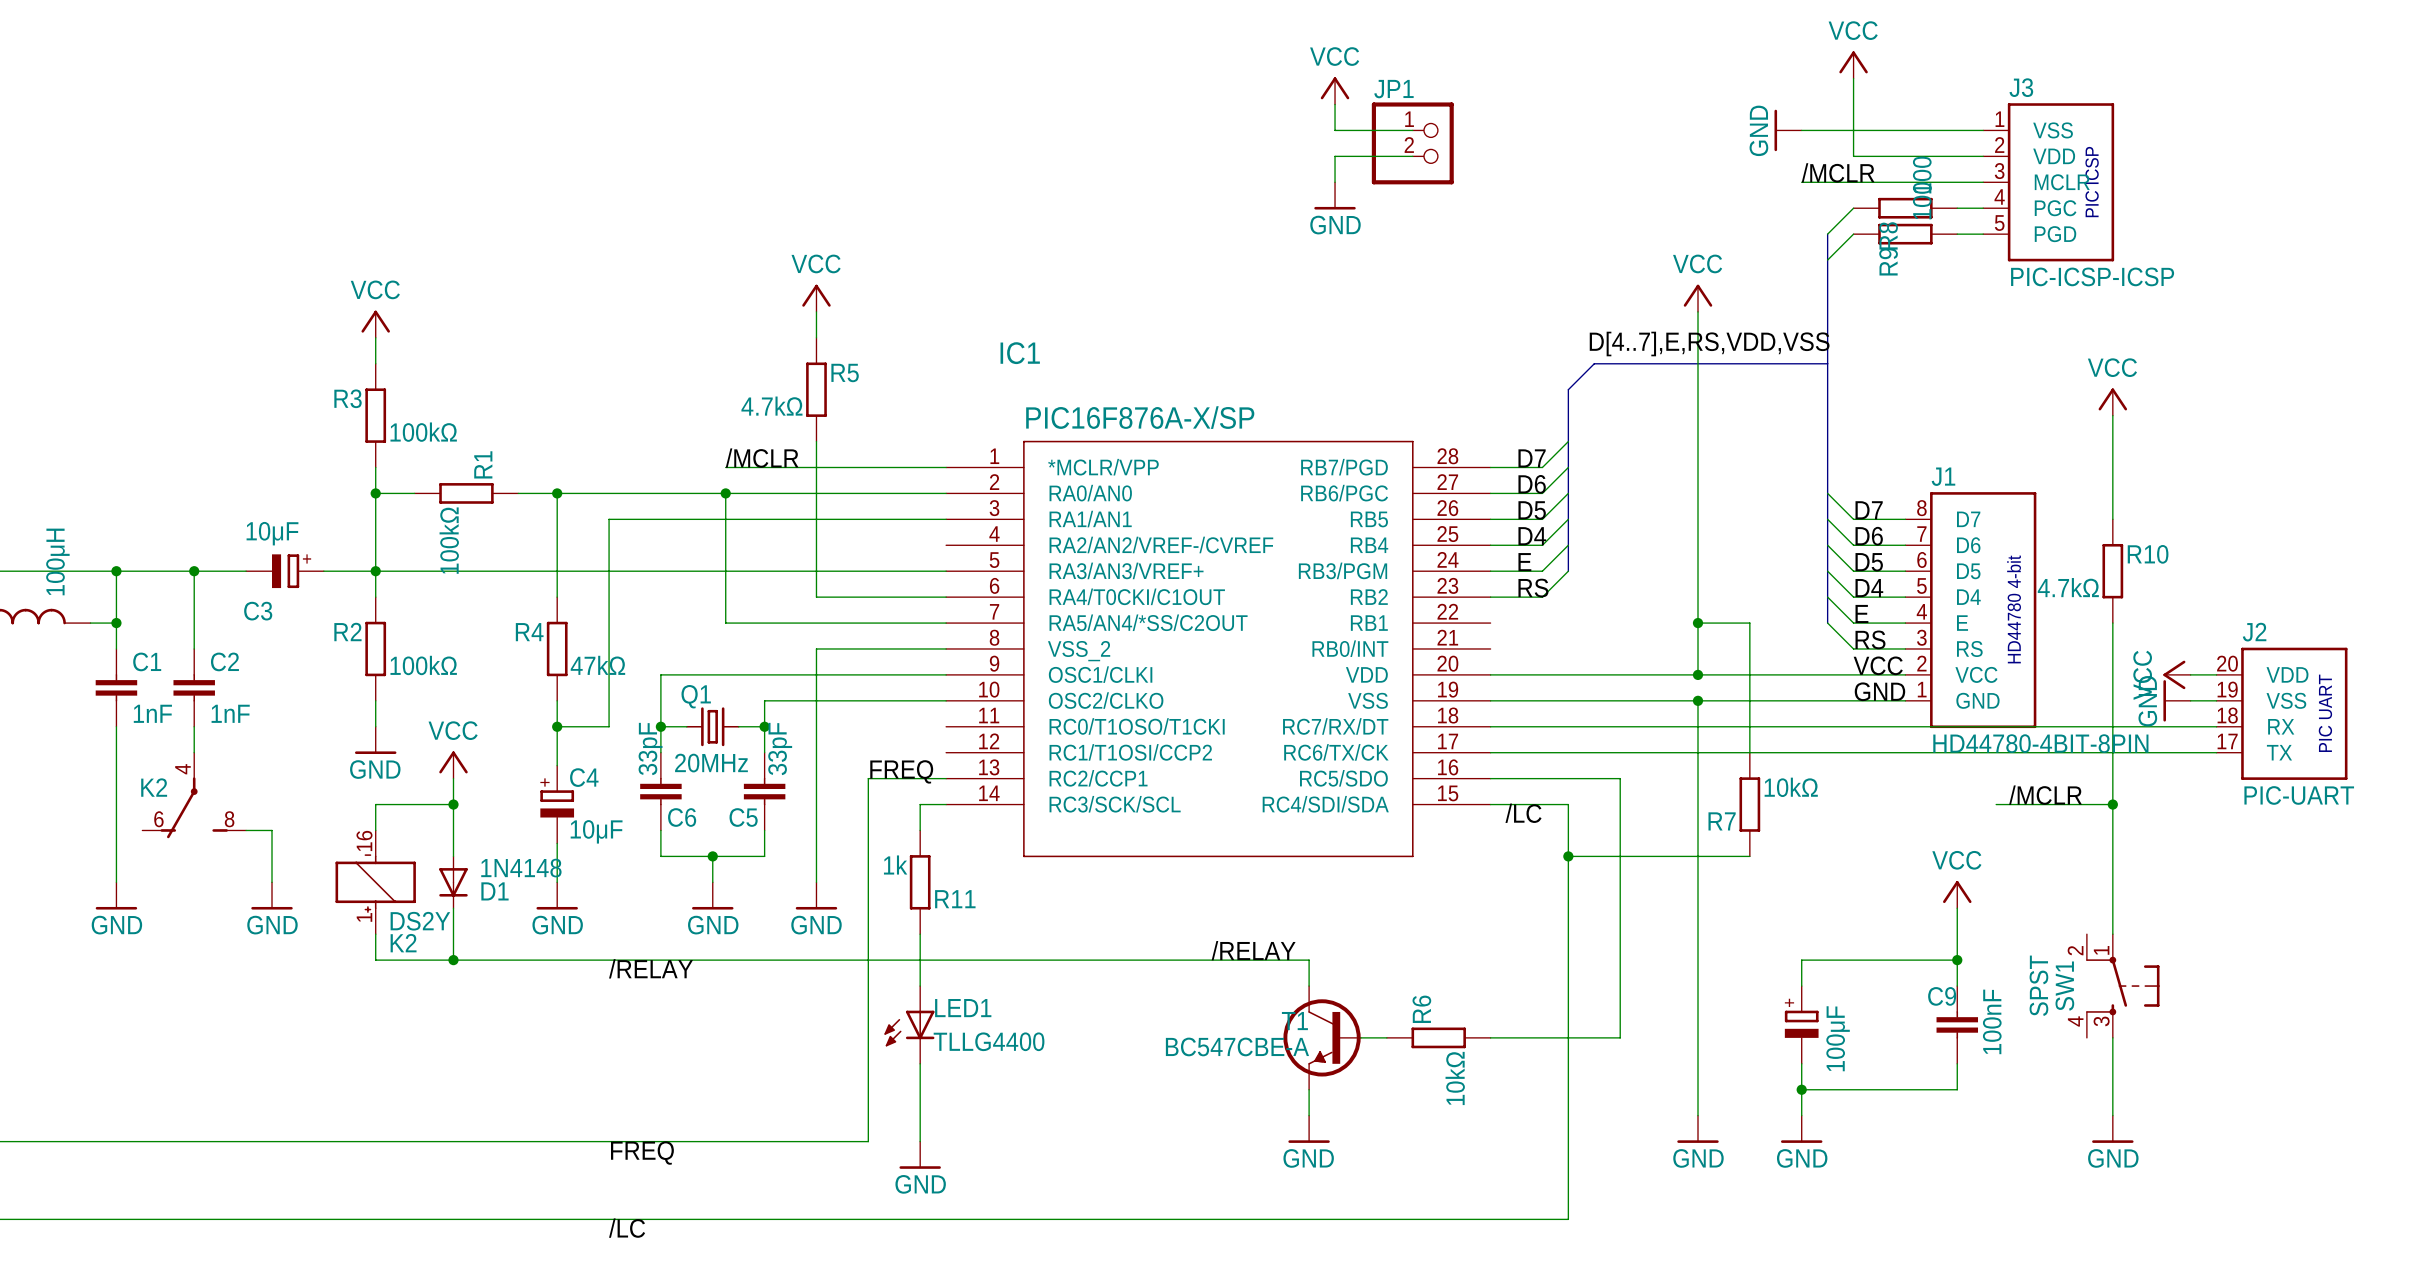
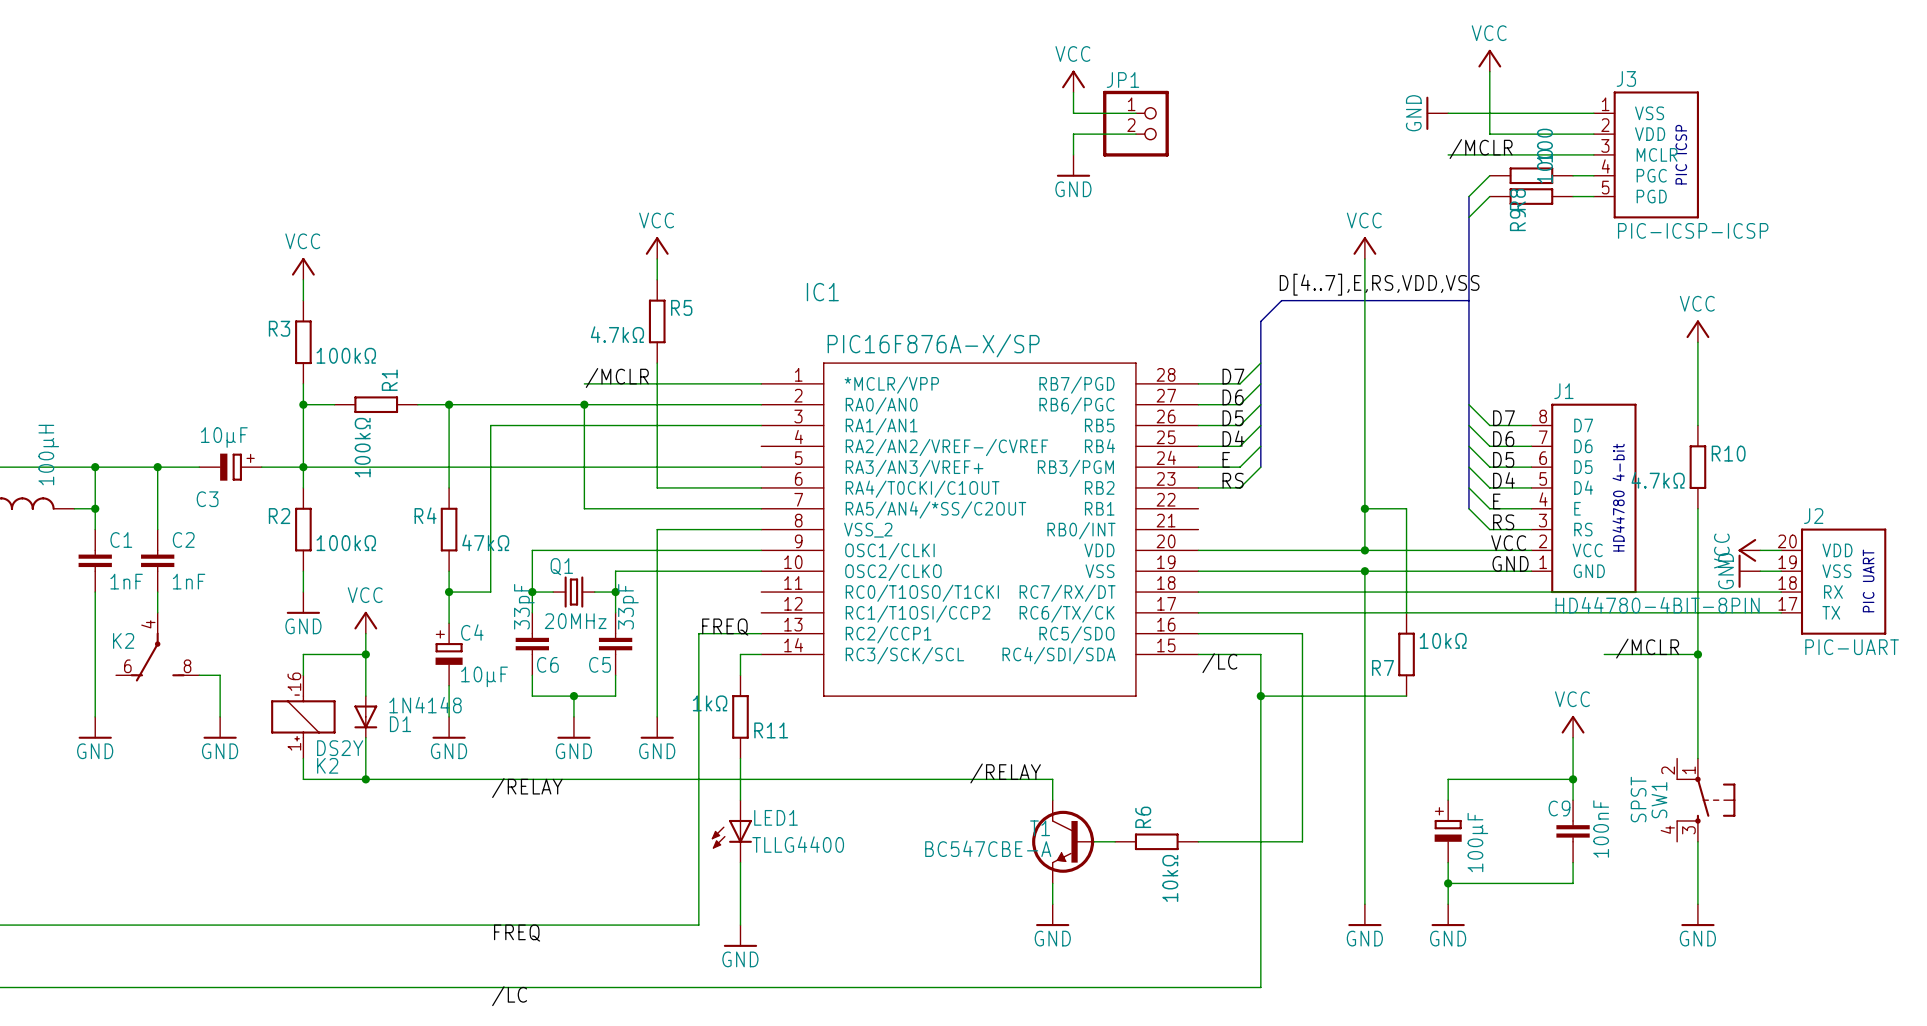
R11 value: 1k (895, 864) -> 1kΩ (710, 703)

